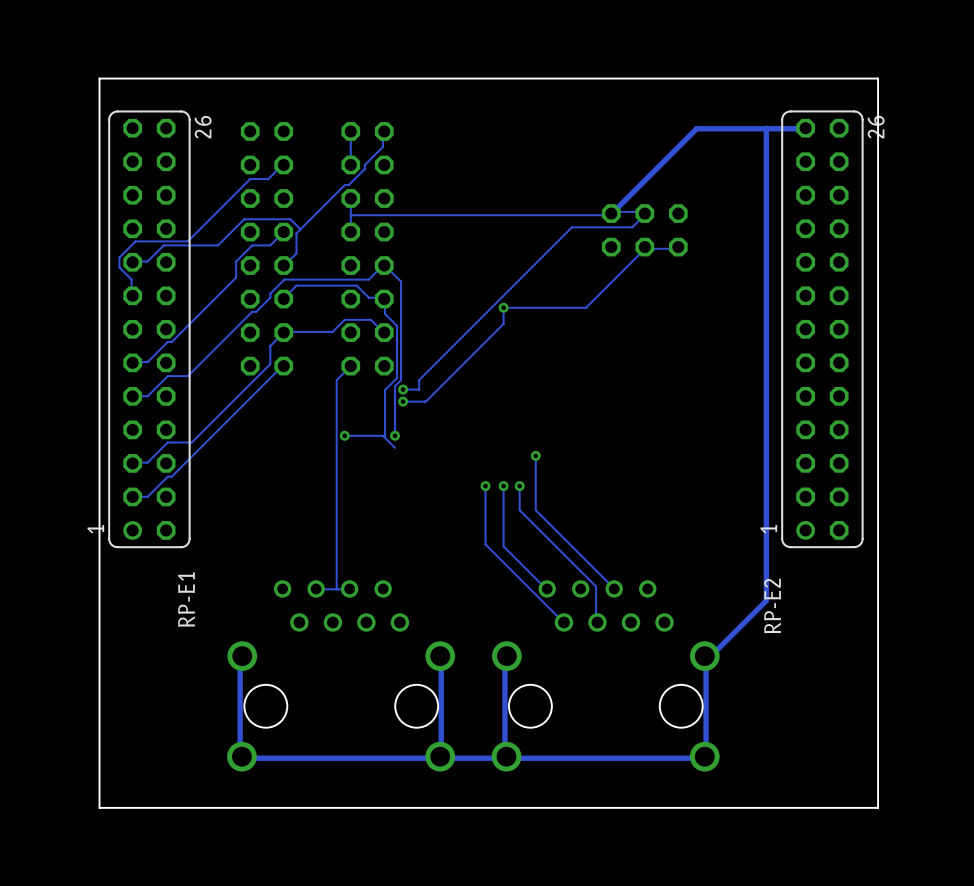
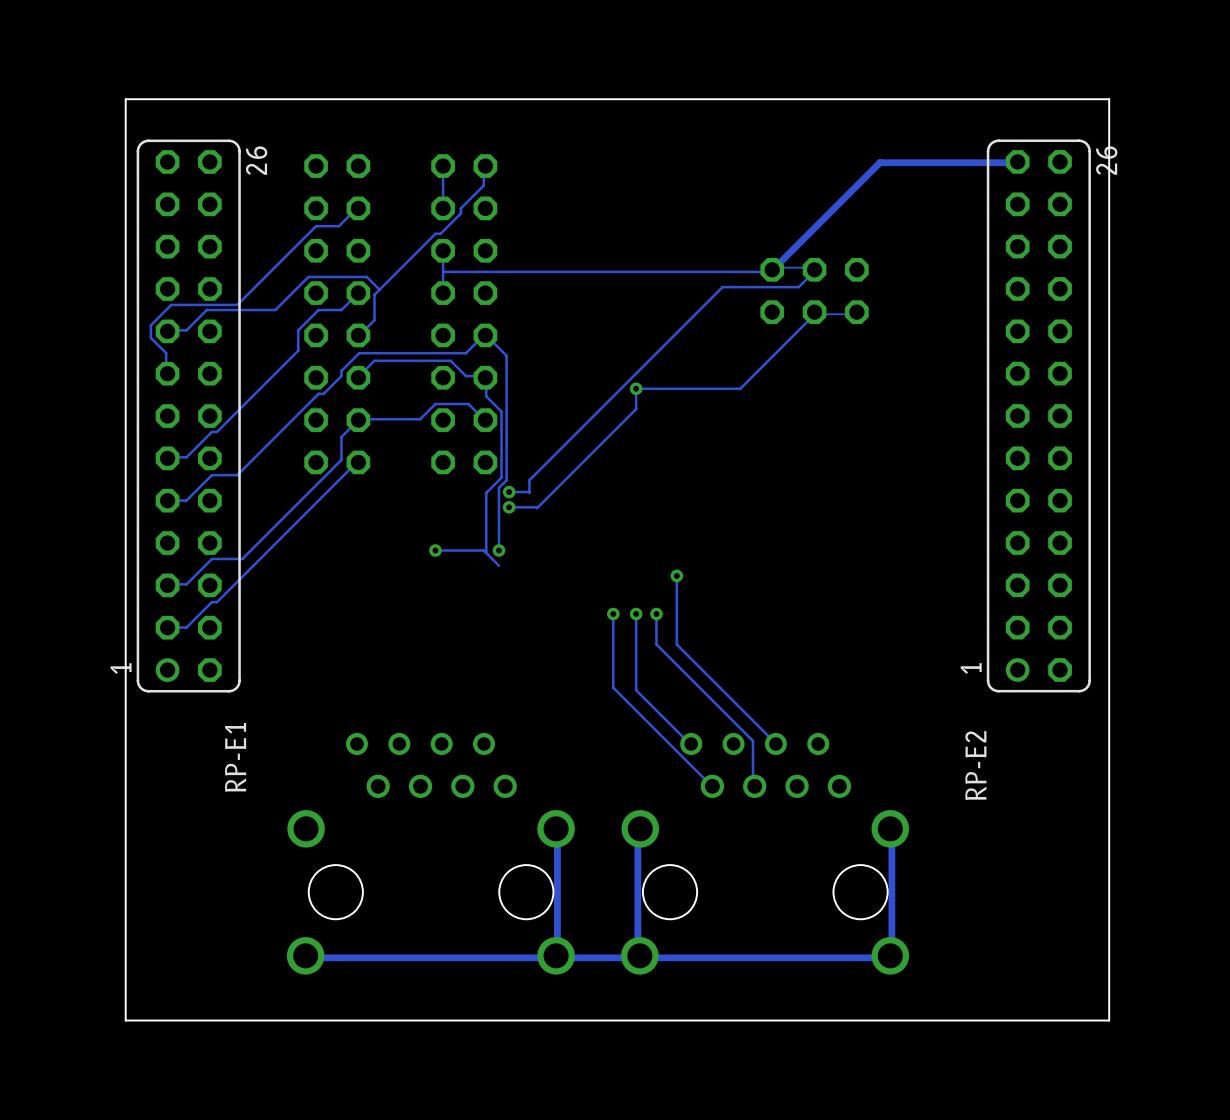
track: (806, 128) (766, 128) (766, 600) (706, 661) -> none
track: (350, 366) (336, 380) (336, 589) -> none
track: (349, 588) (316, 588) -> none
track: (243, 664) (243, 661) (240, 664) (240, 754) -> none

